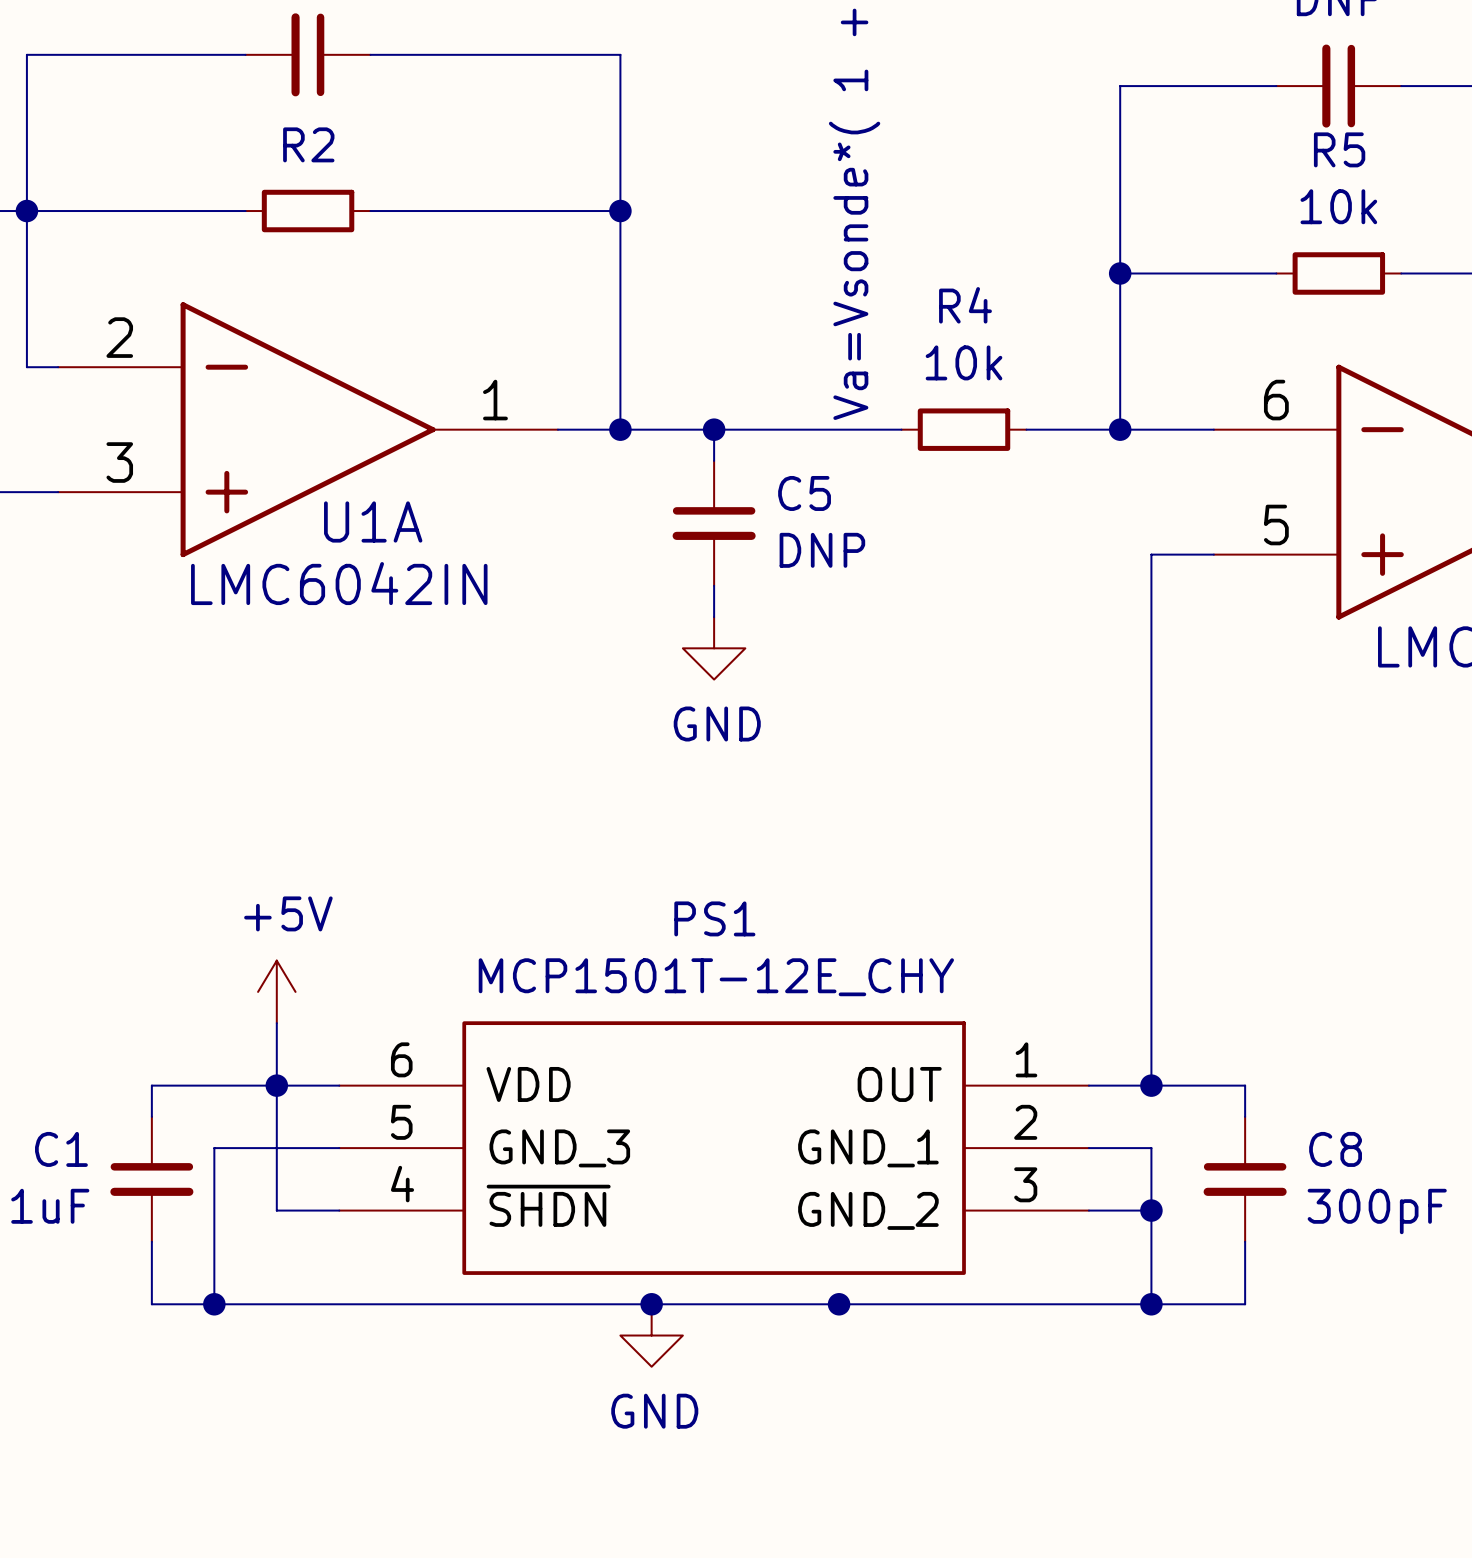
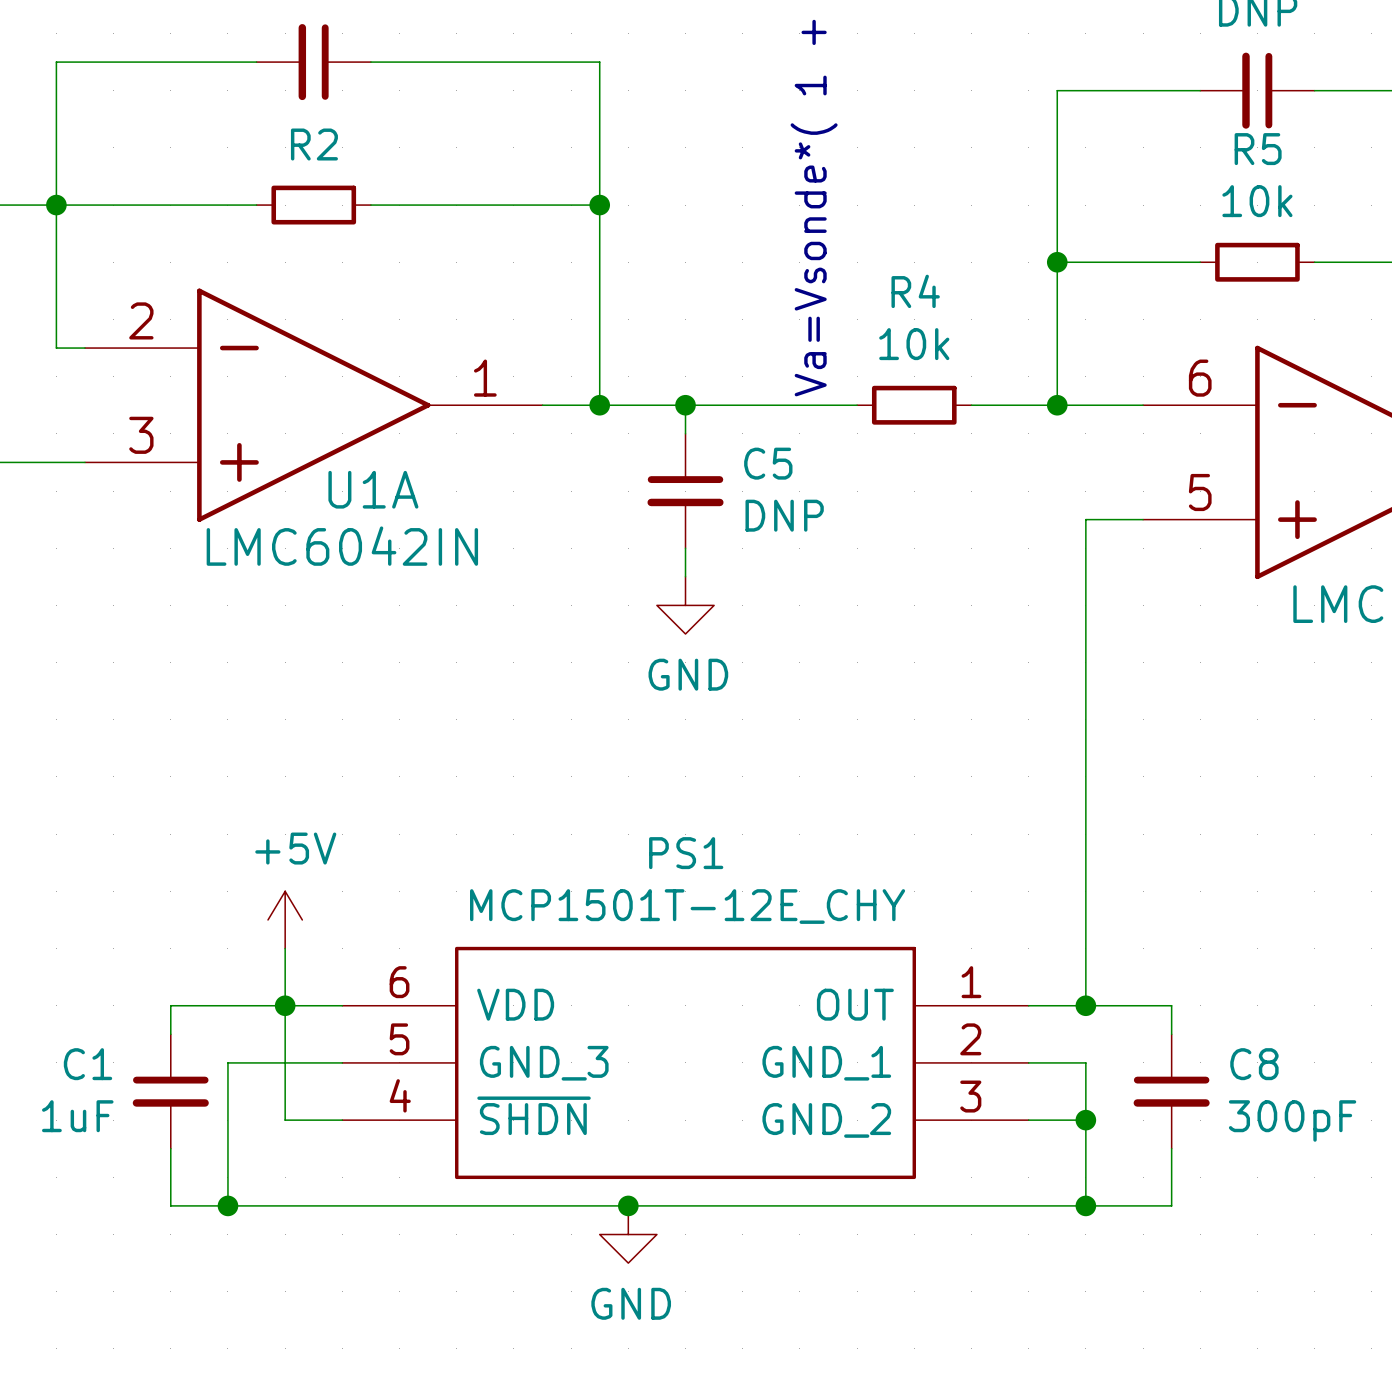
junction: (839, 1304) -> none

